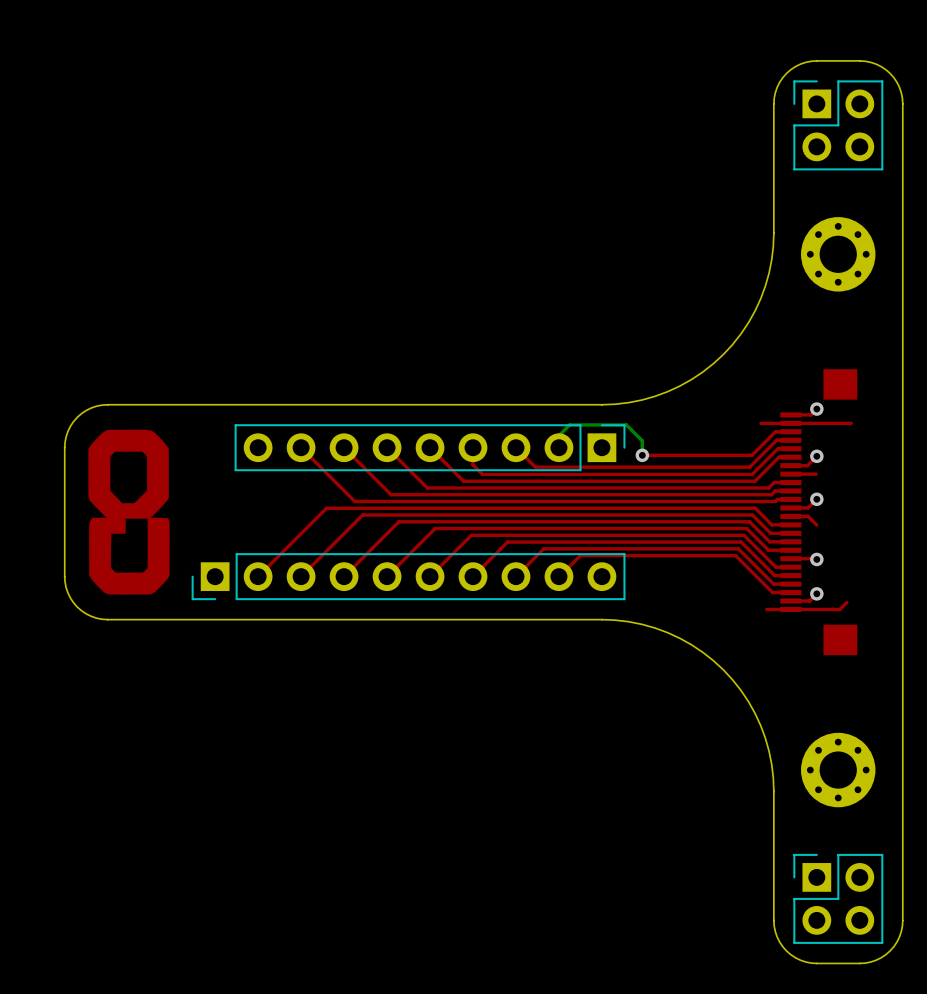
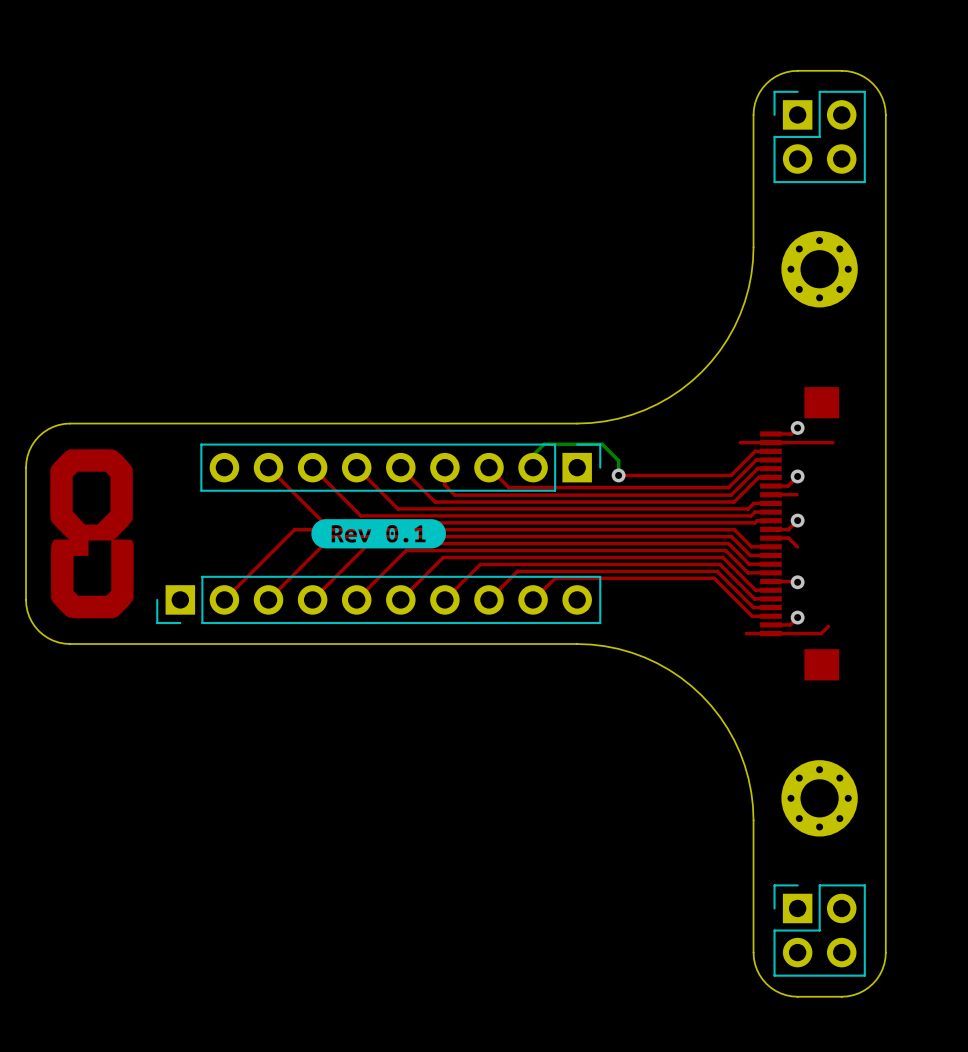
drawing: none -> [311, 519, 446, 549]

